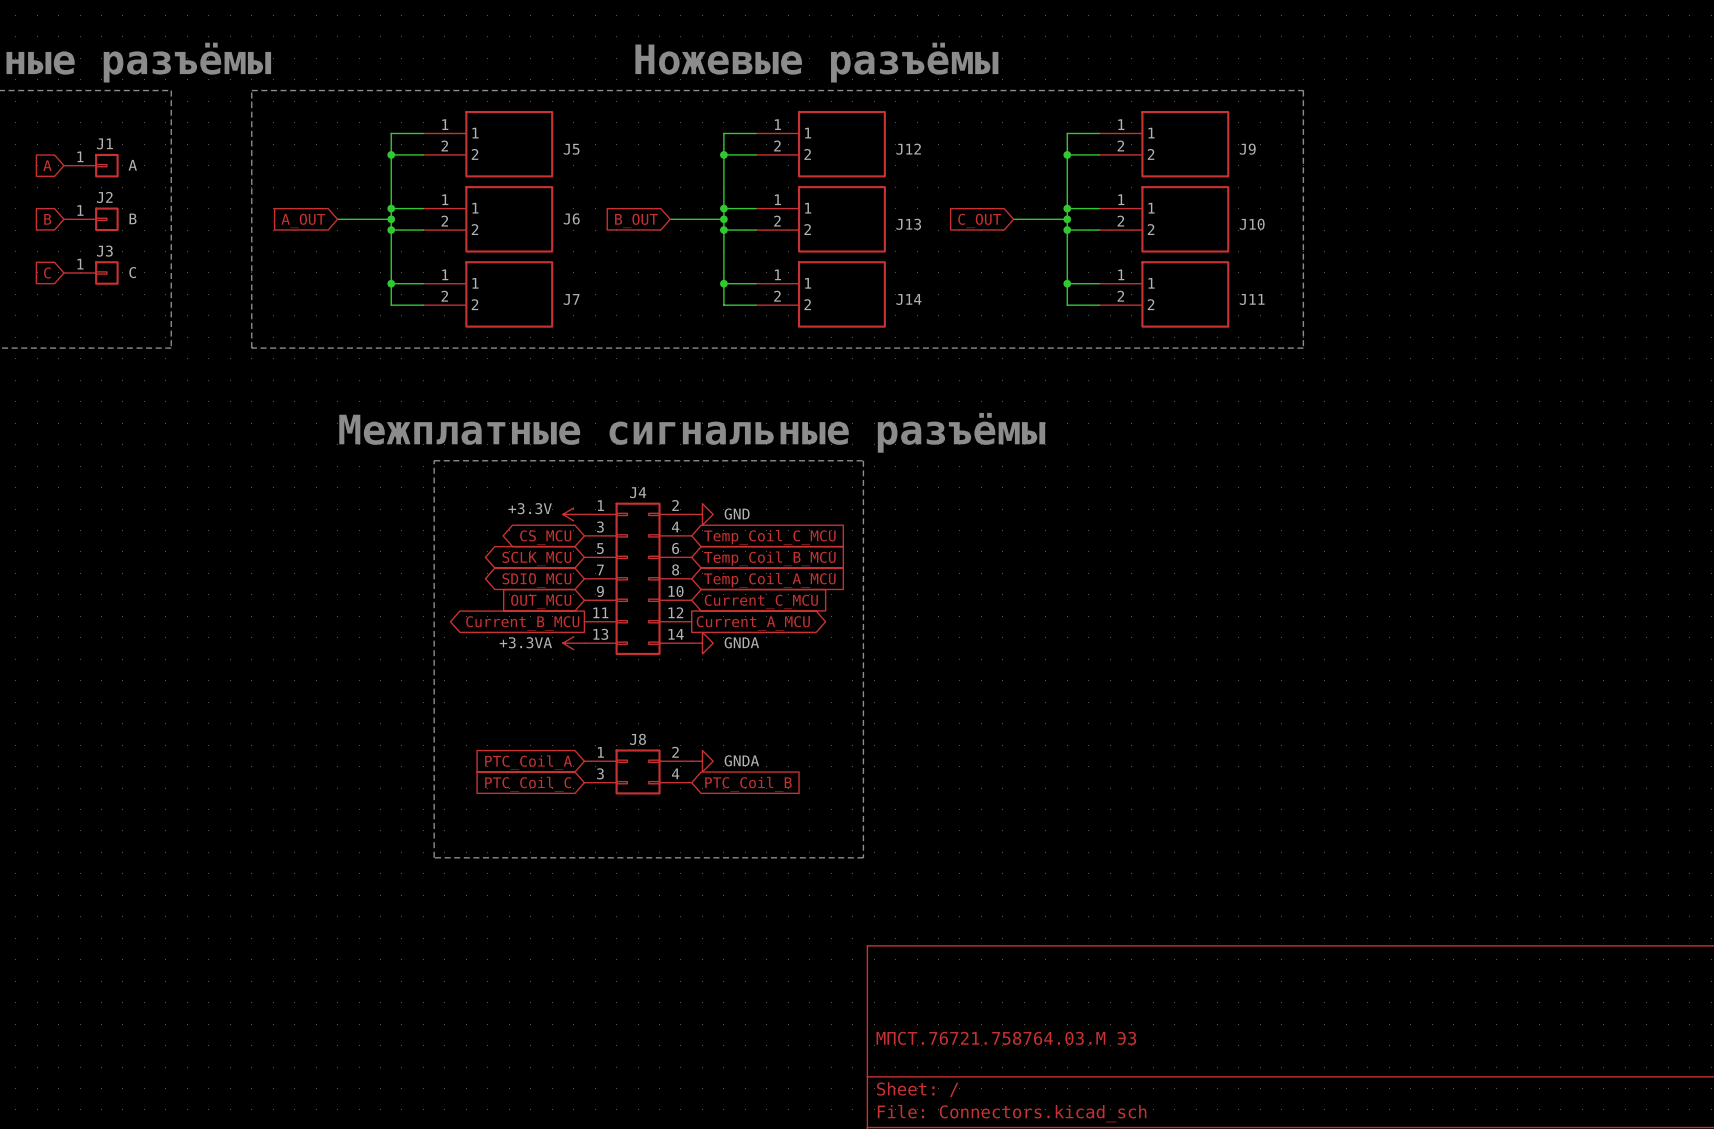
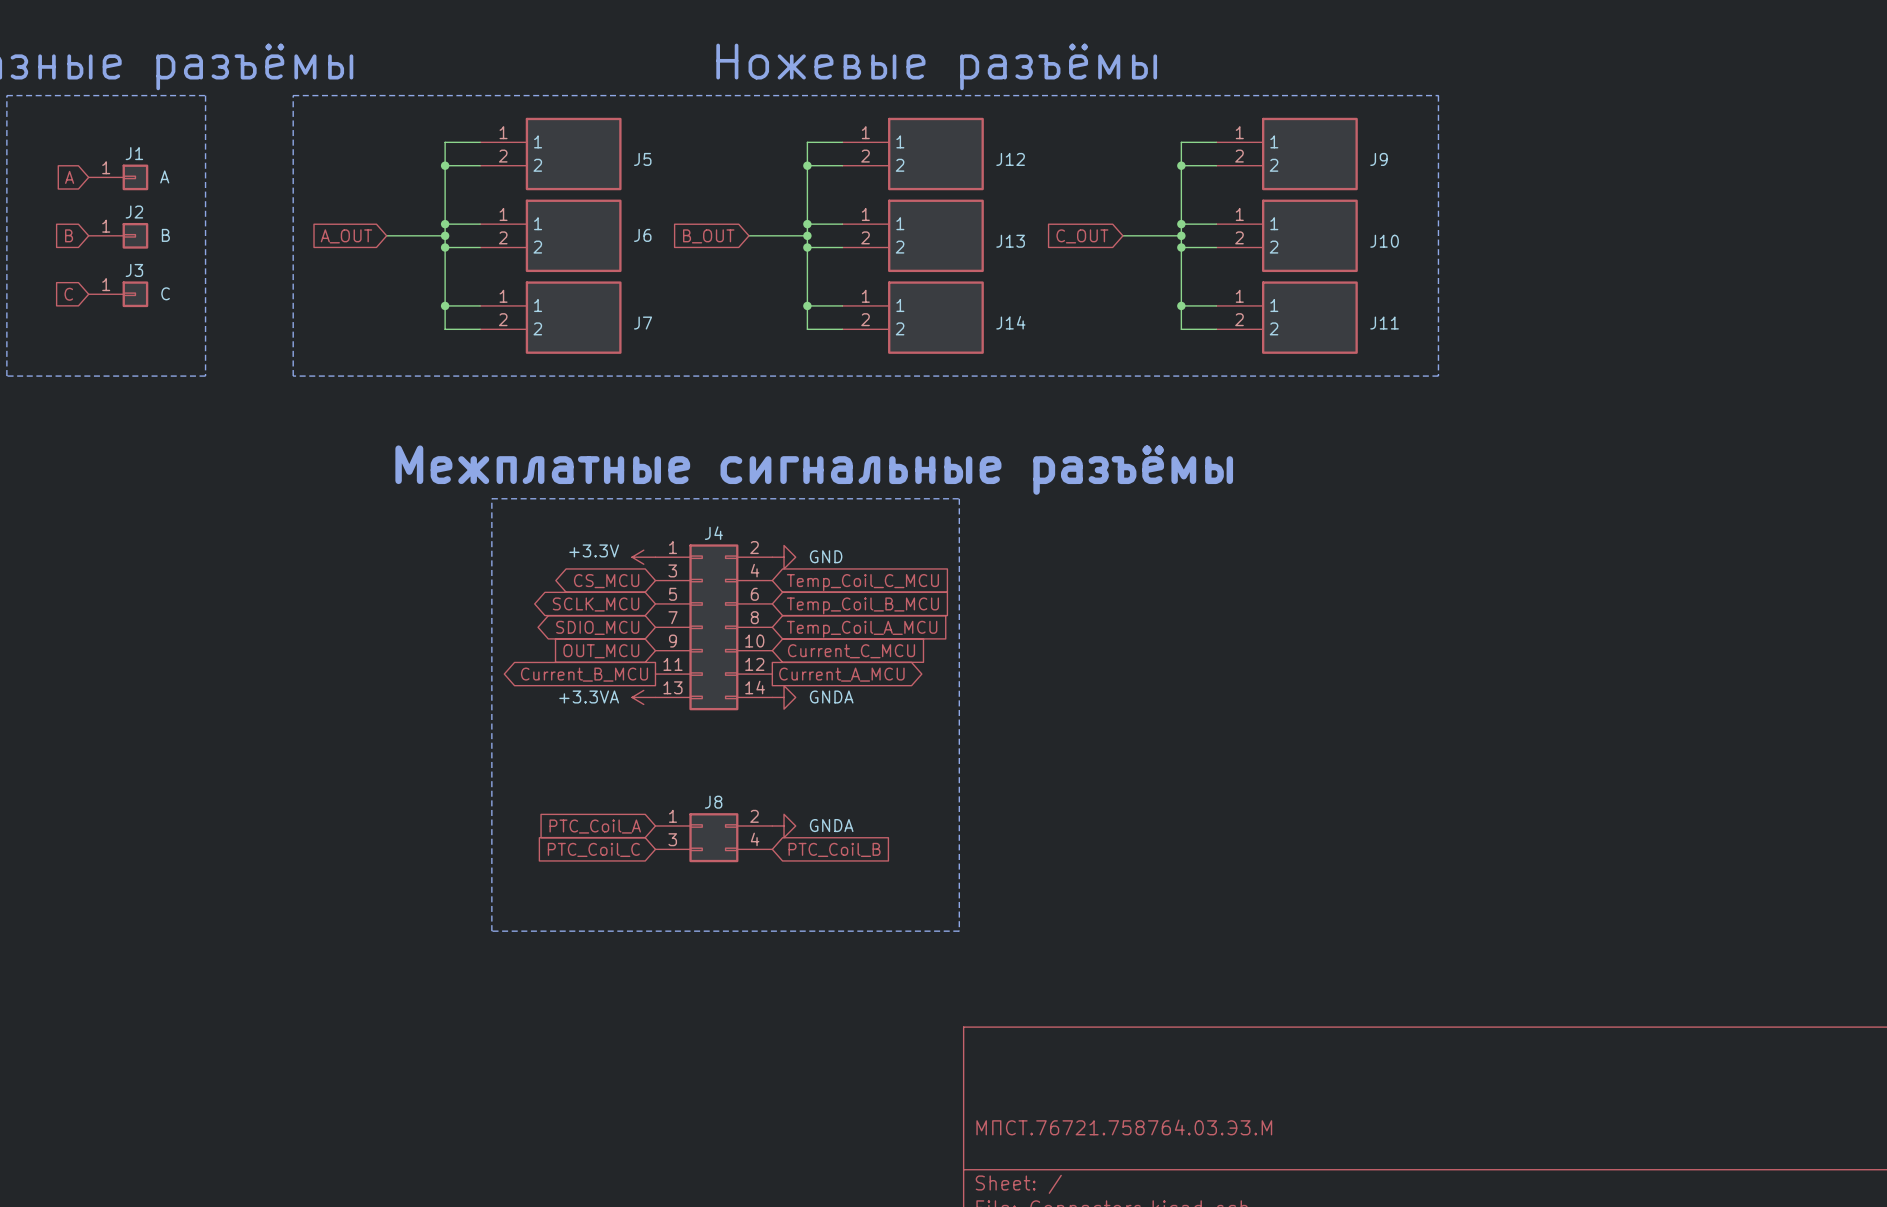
title block: МПСТ.76721.758764.03.М Э3 (1006, 1038) -> МПСТ.76721.758764.03.Э3.М (1124, 1127)

